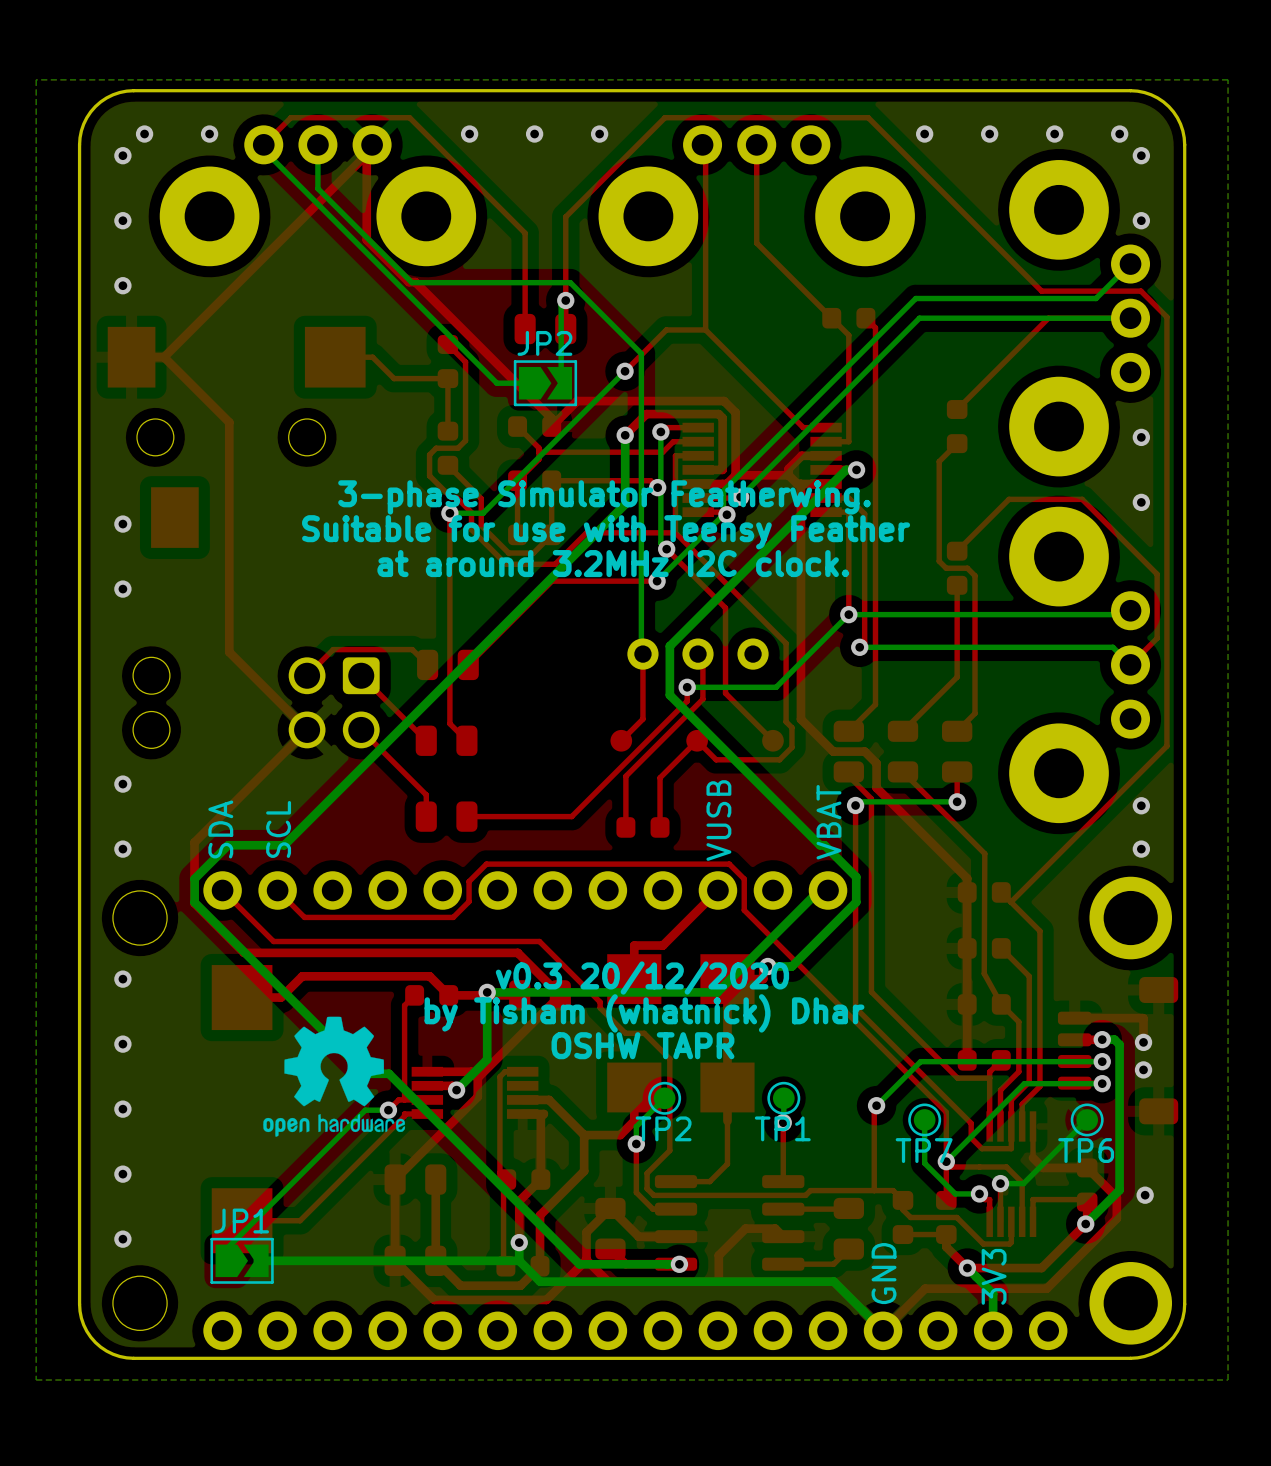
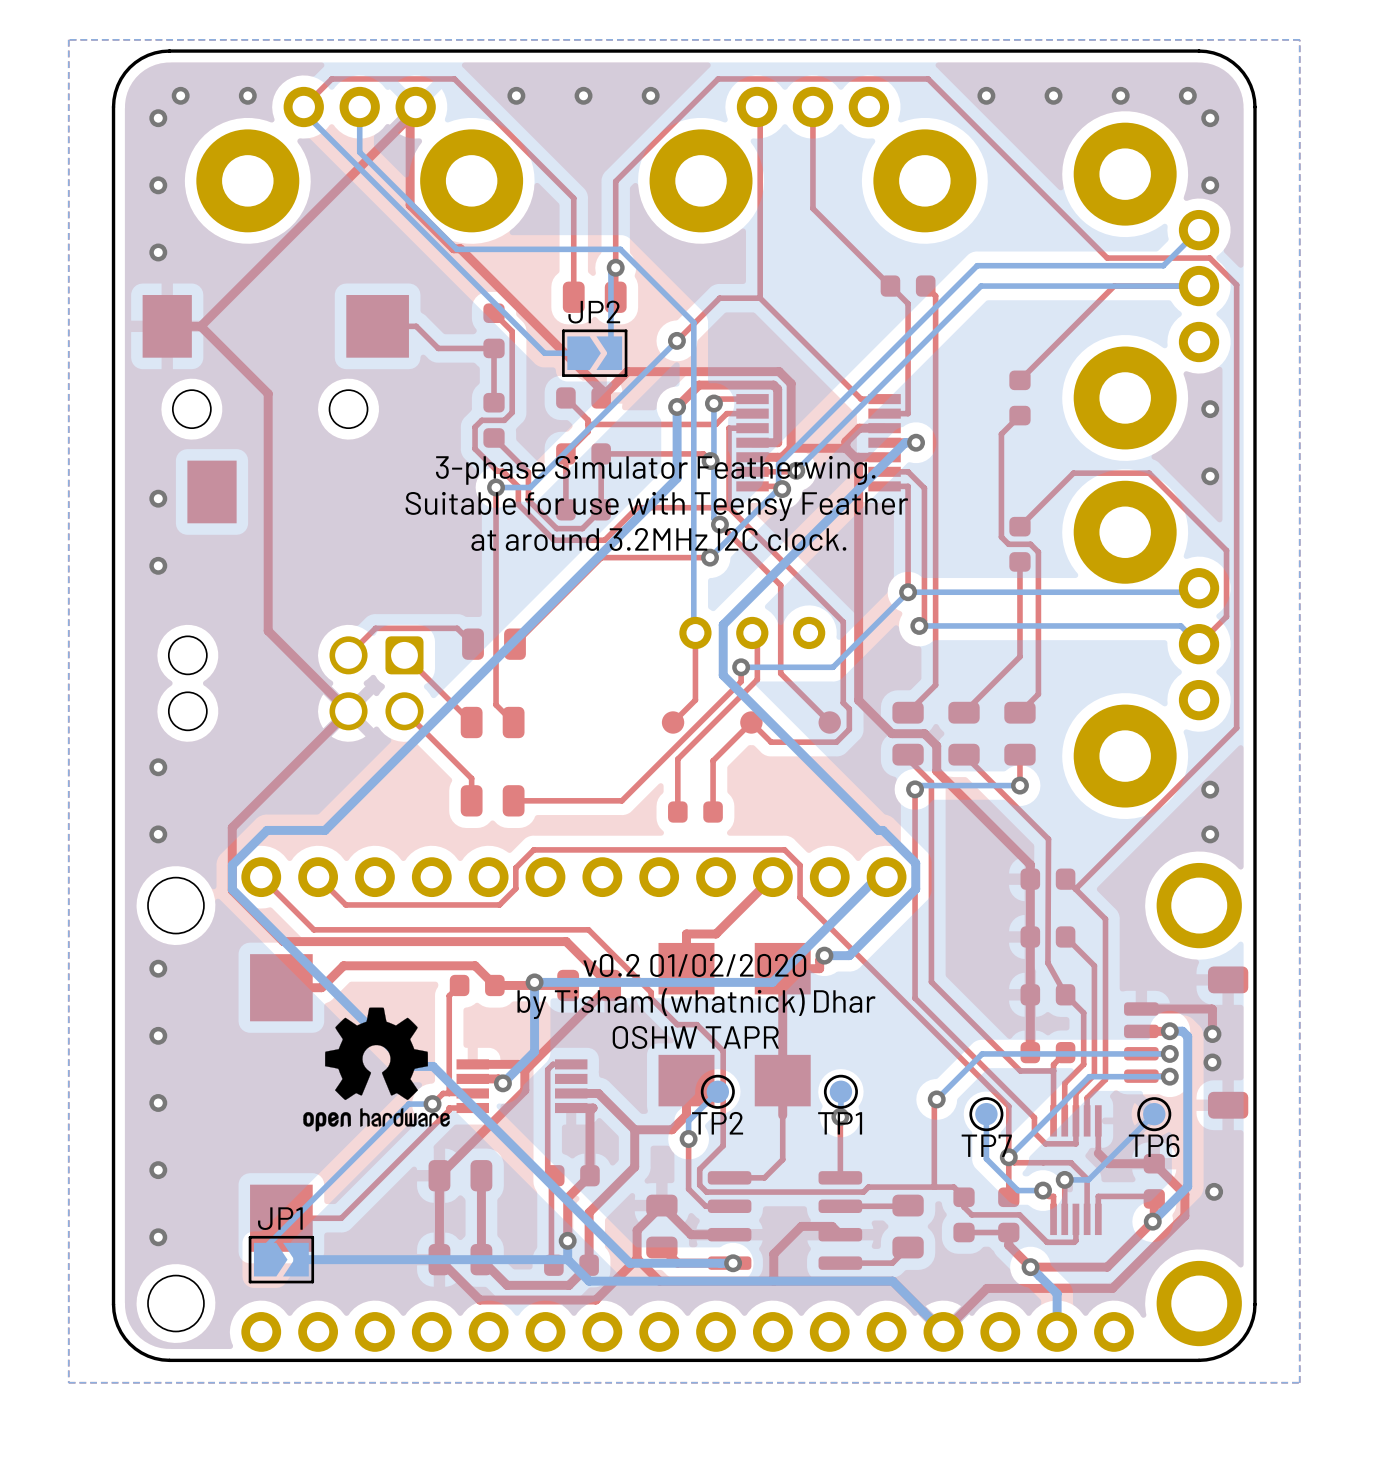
text: VUSB (718, 820) -> none
text: VBAT (828, 822) -> none
text: SDA (220, 829) -> none
text: SCL (278, 829) -> none
text: v0.3 20/12/2020 (642, 977) -> v0.2 01/02/2020 (694, 965)
text: GND (884, 1273) -> none
text: 3V3 (994, 1276) -> none

